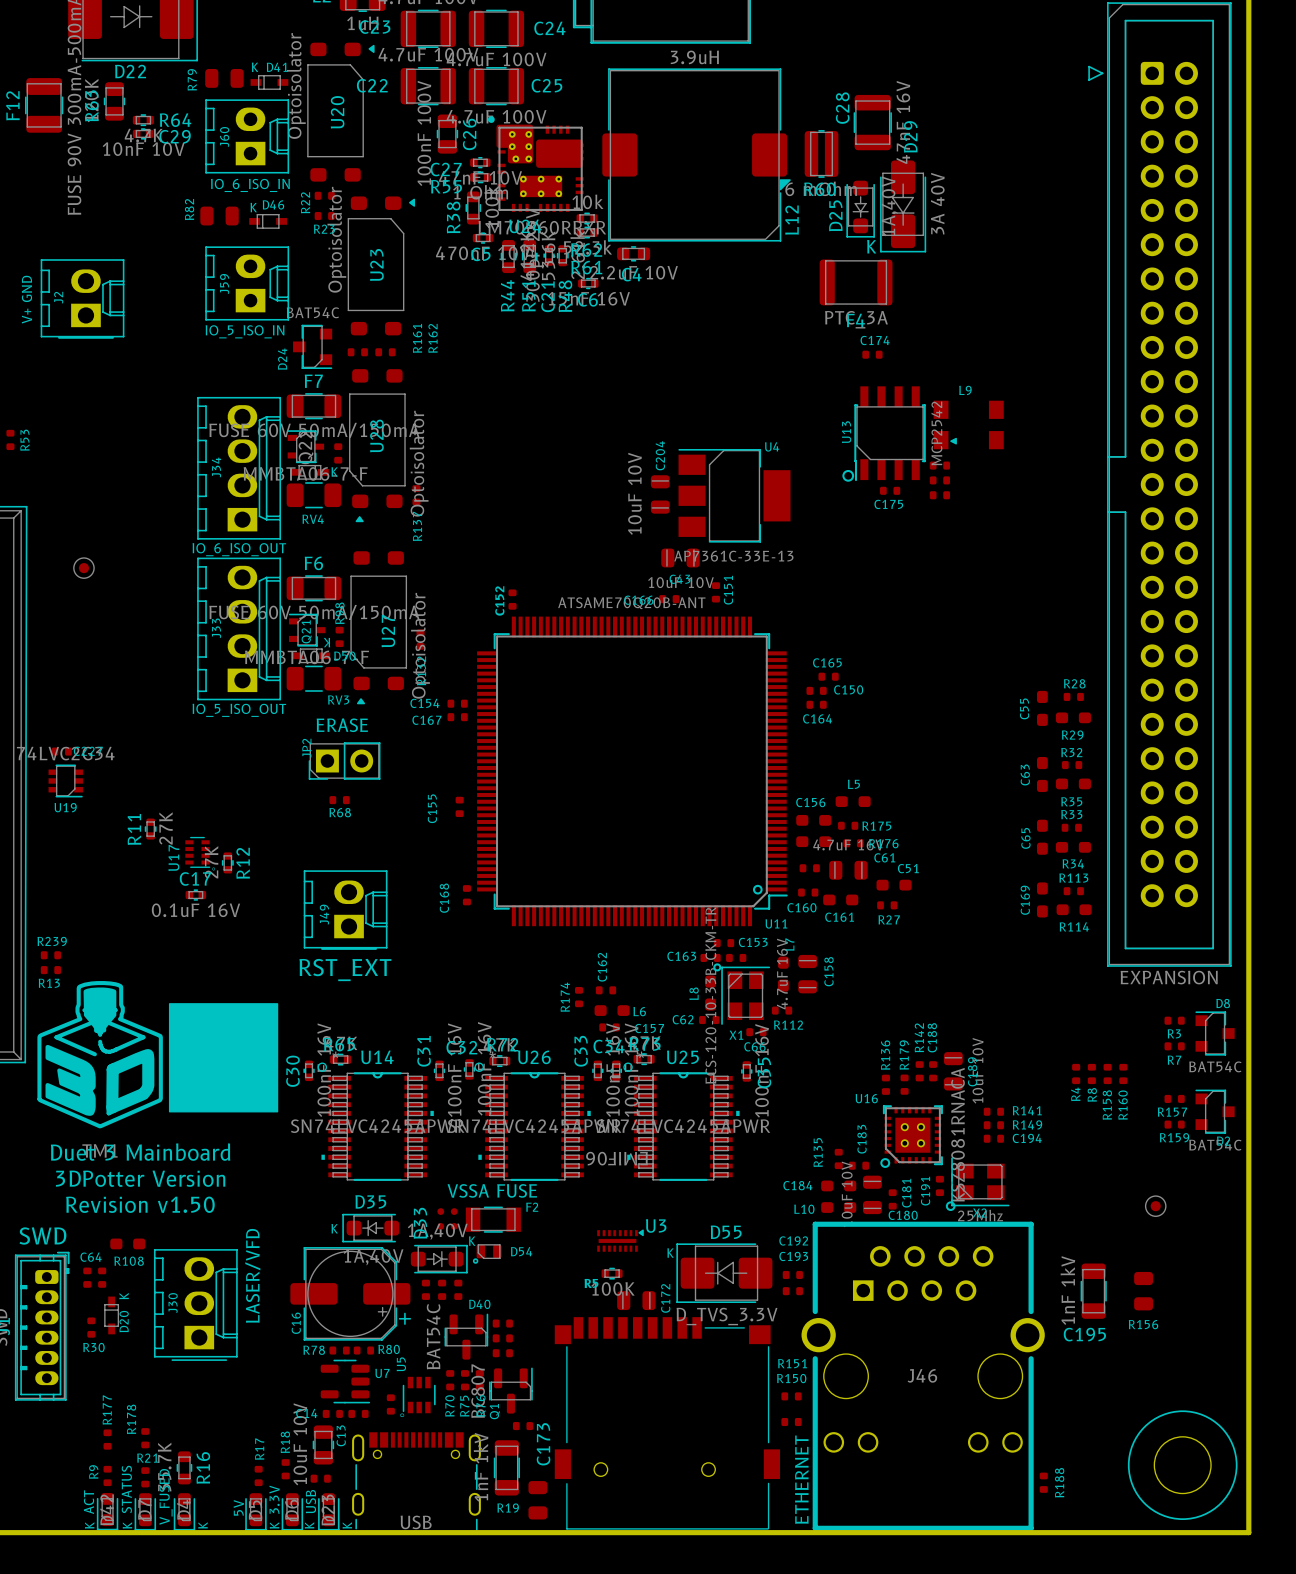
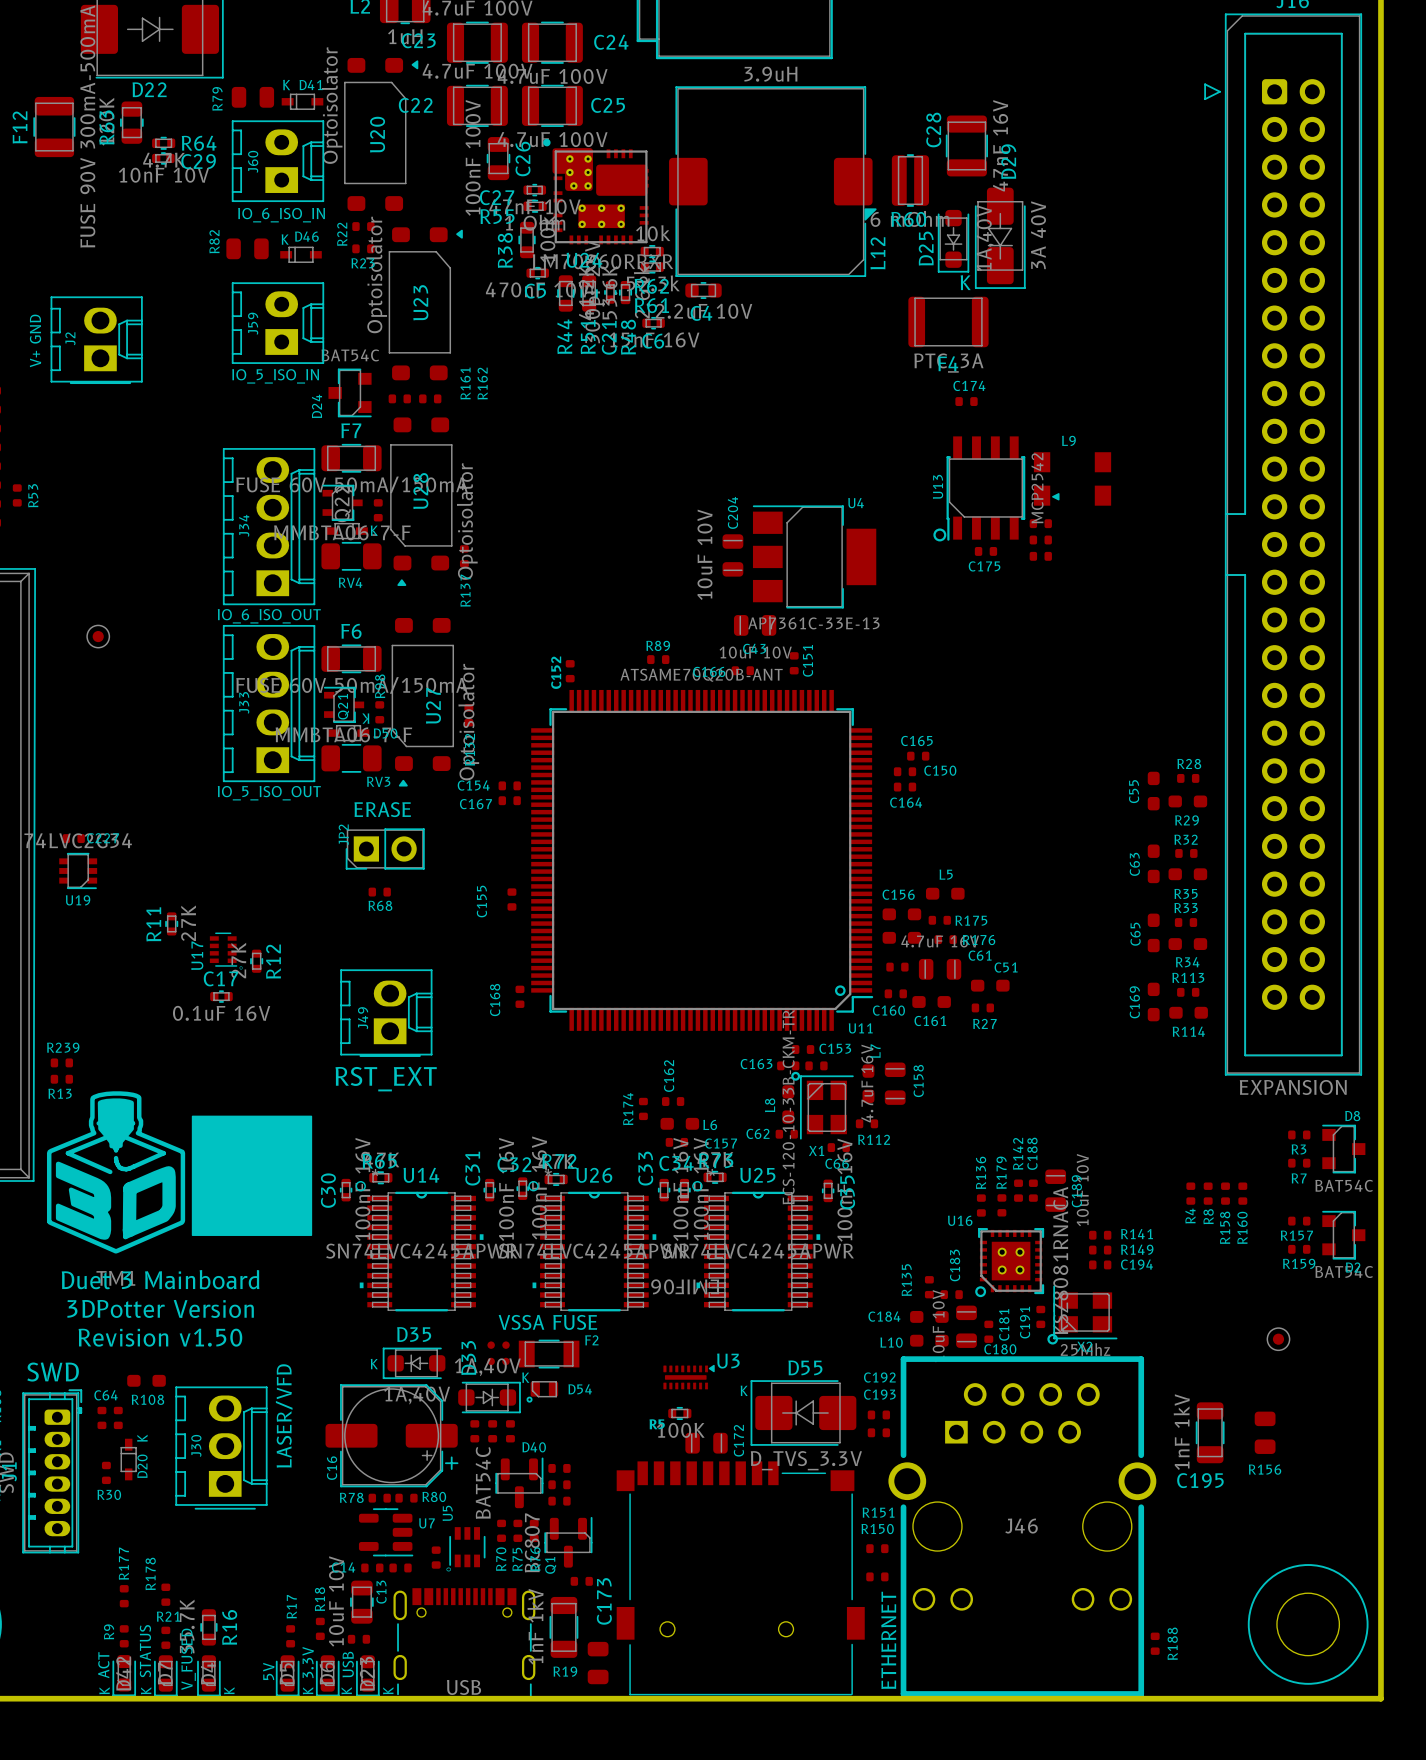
R89: none -> (658, 659)

